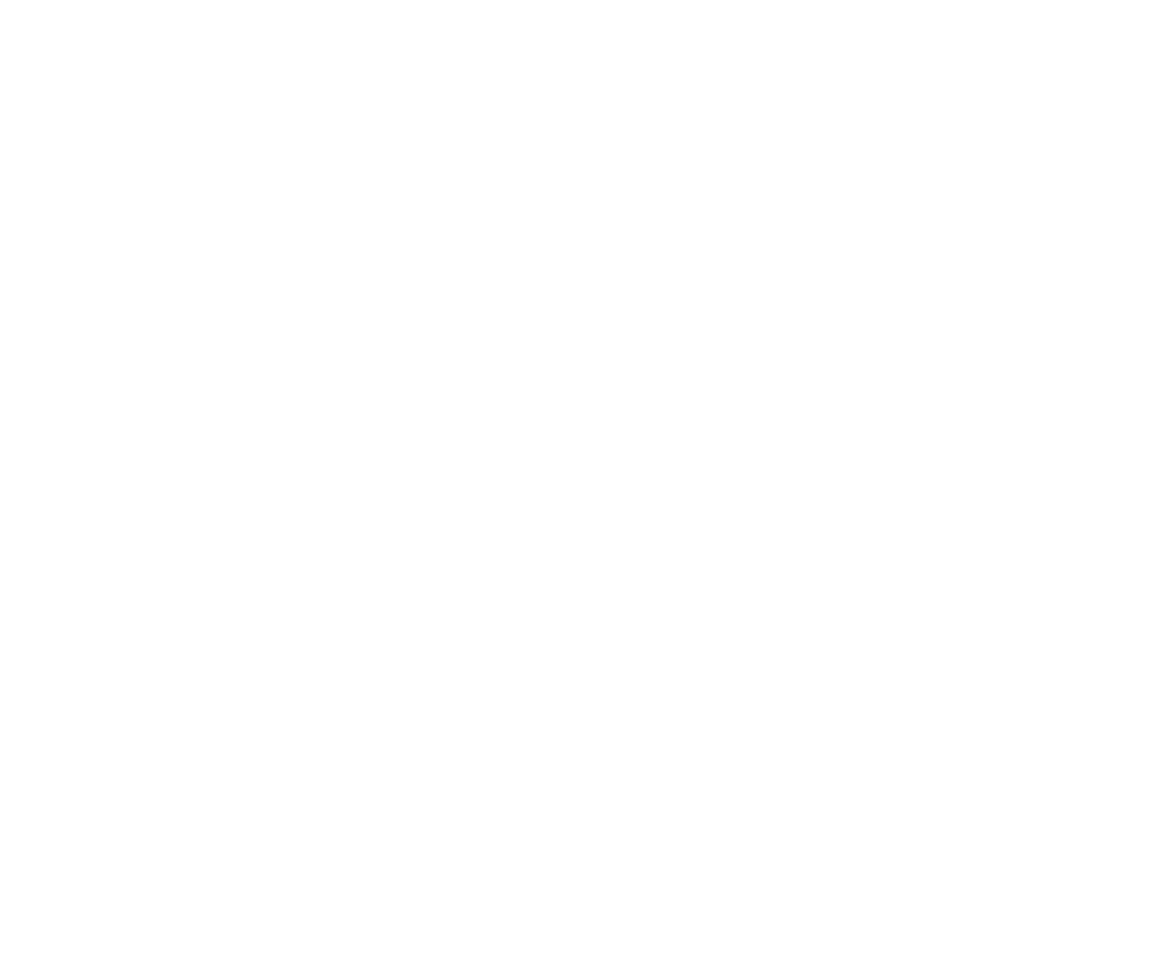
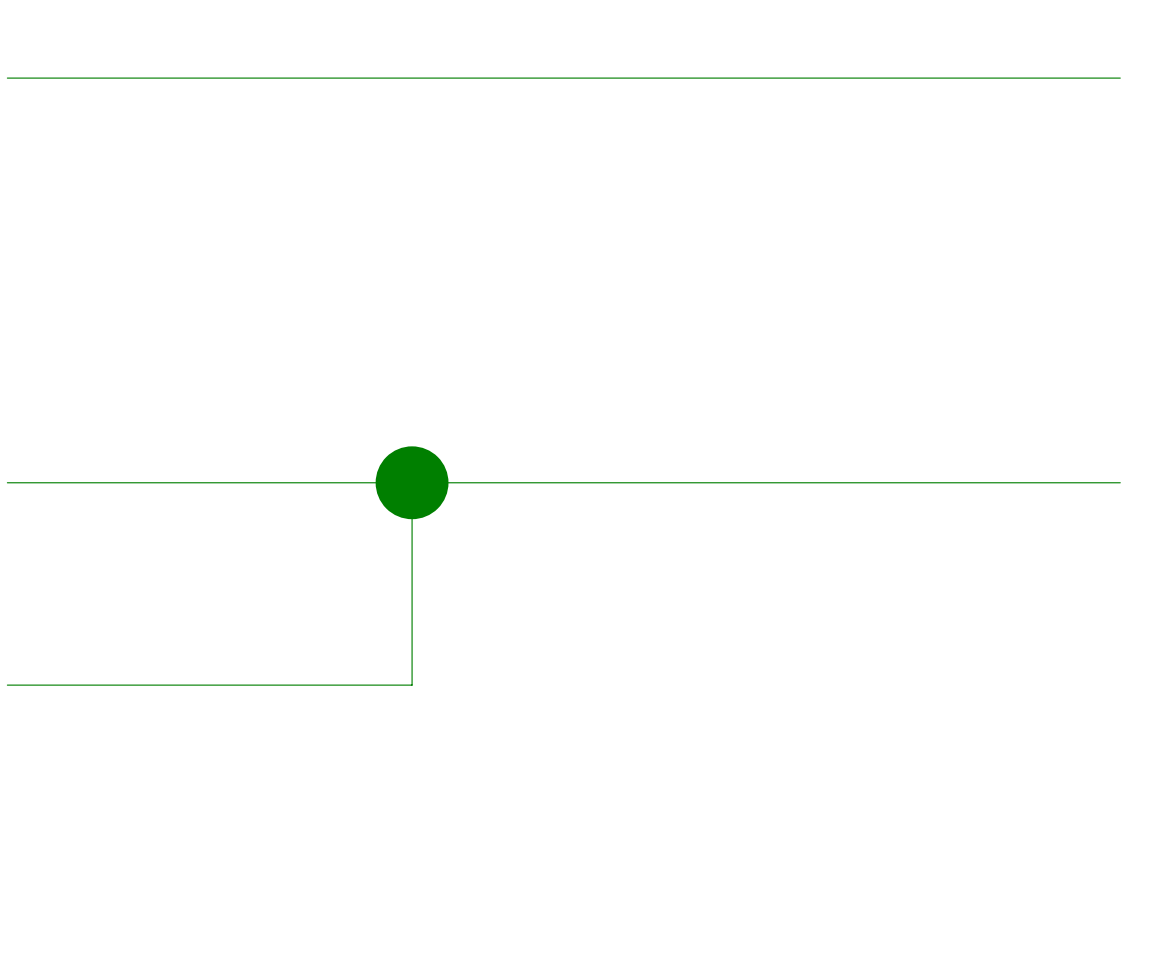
wire: none -> (7, 78) (1120, 78)
wire: none -> (7, 482) (1120, 482)
wire: none -> (412, 482) (412, 685) (7, 685)
junction: none -> (412, 482)

